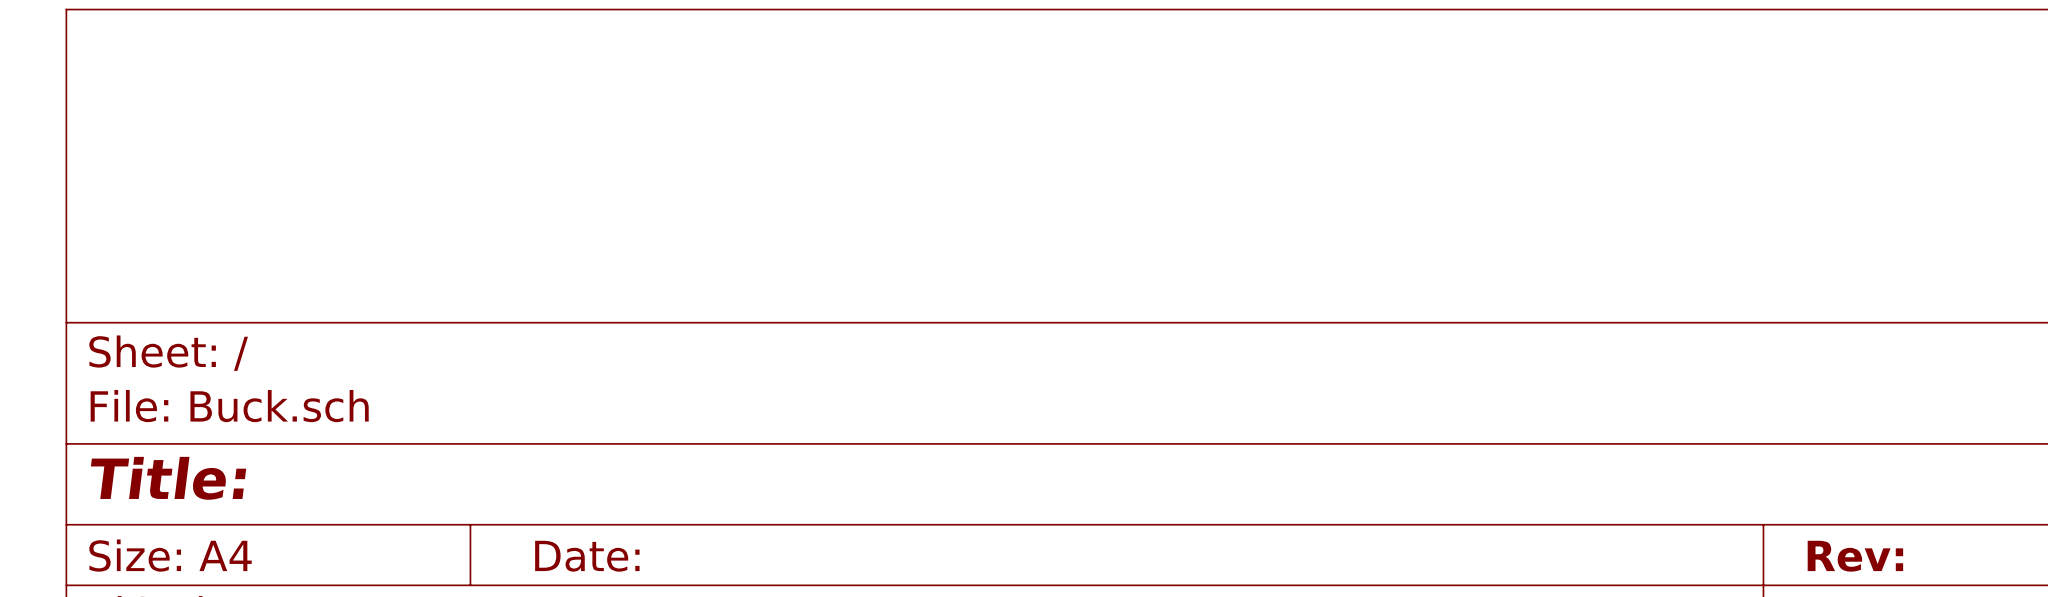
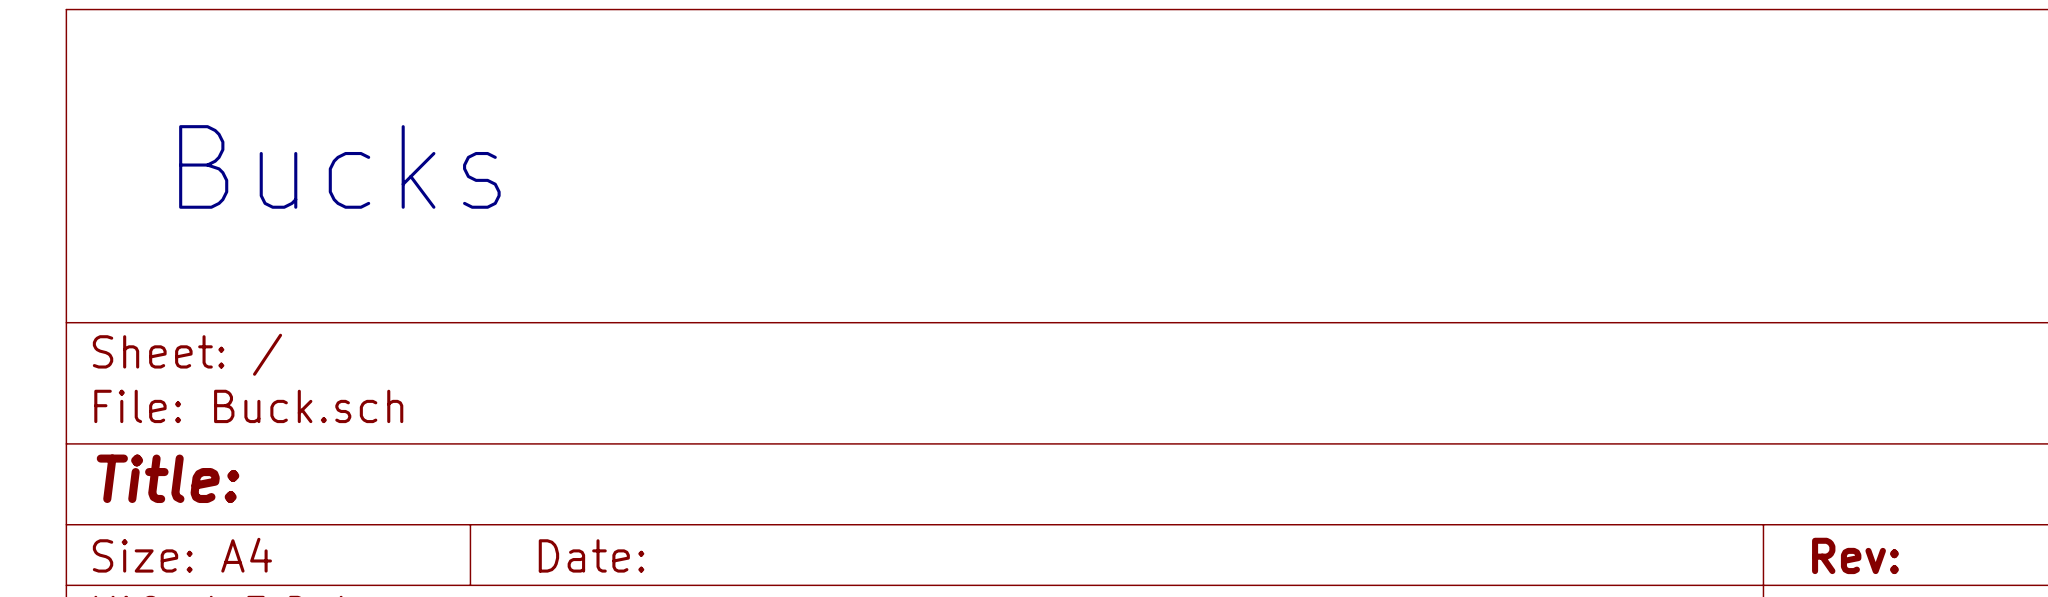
text: none -> Bucks (339, 166)

